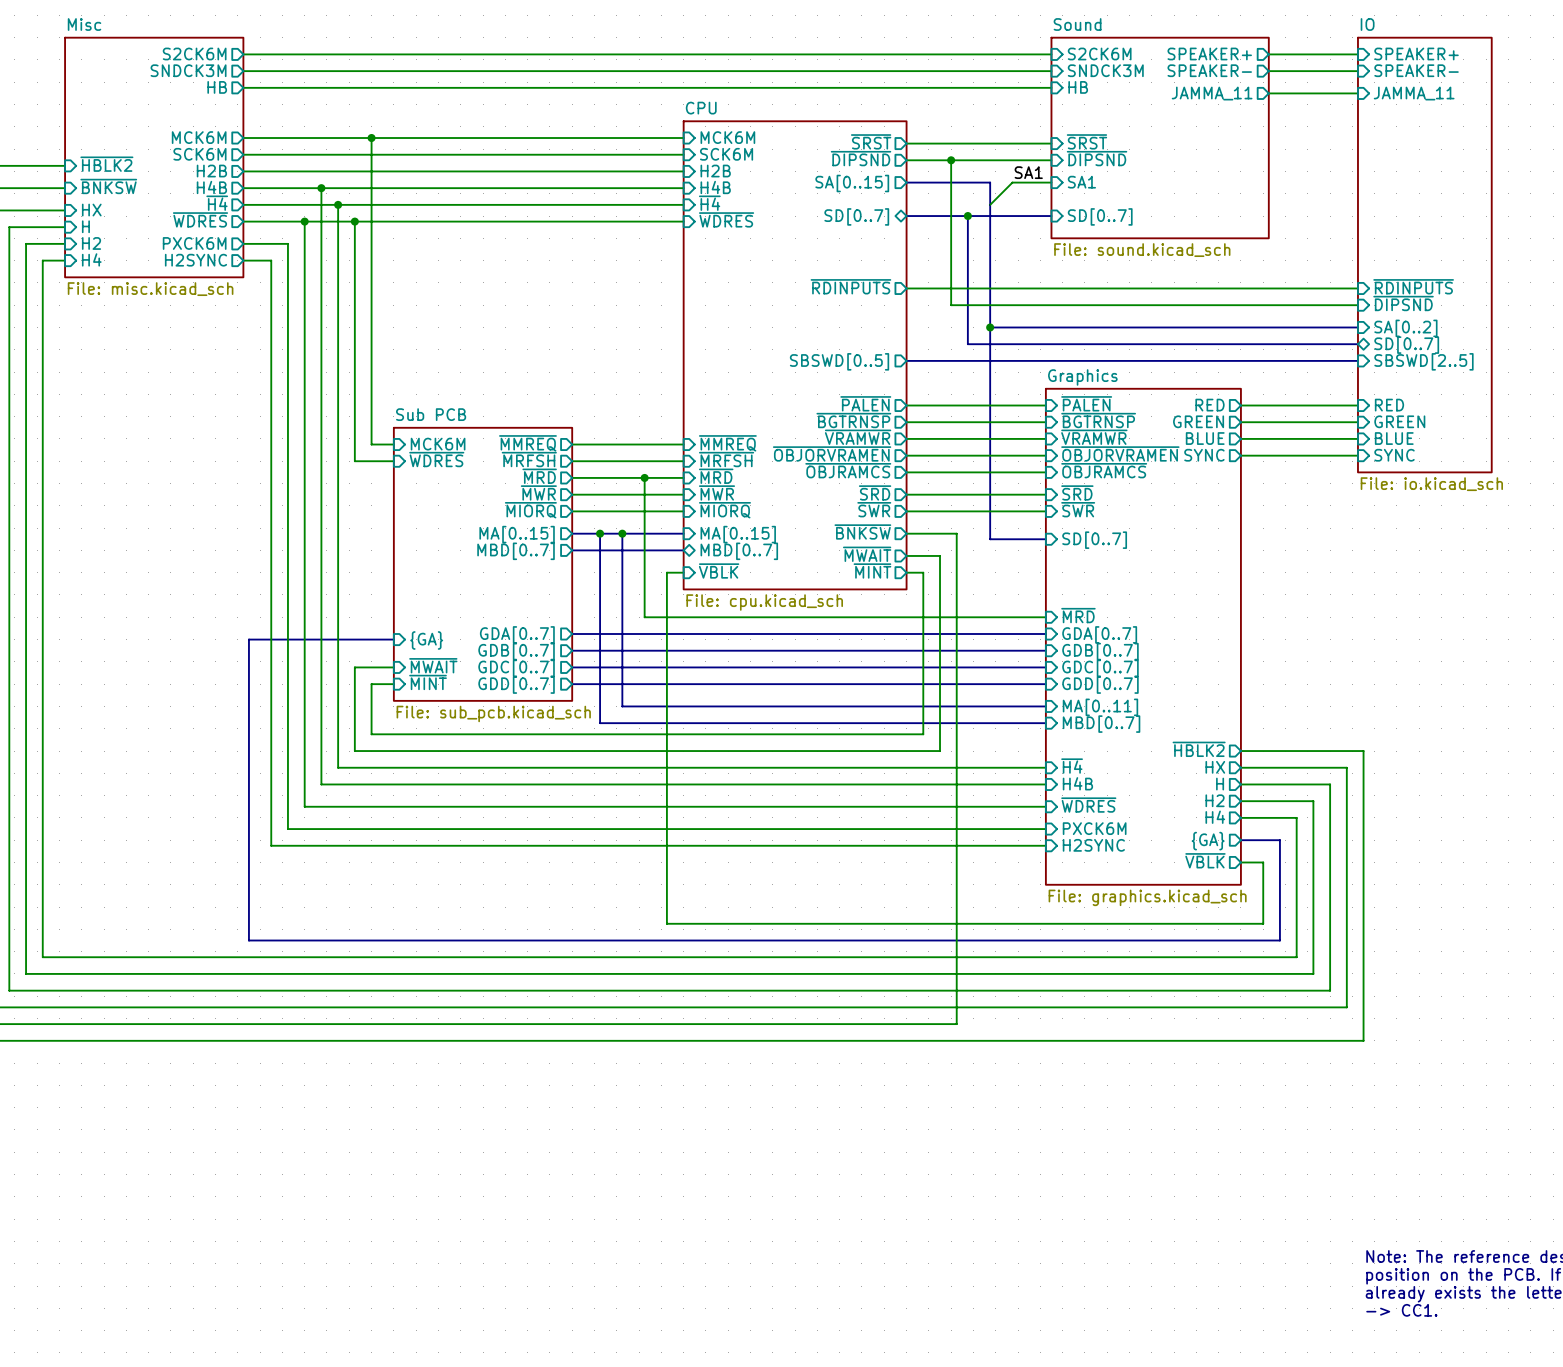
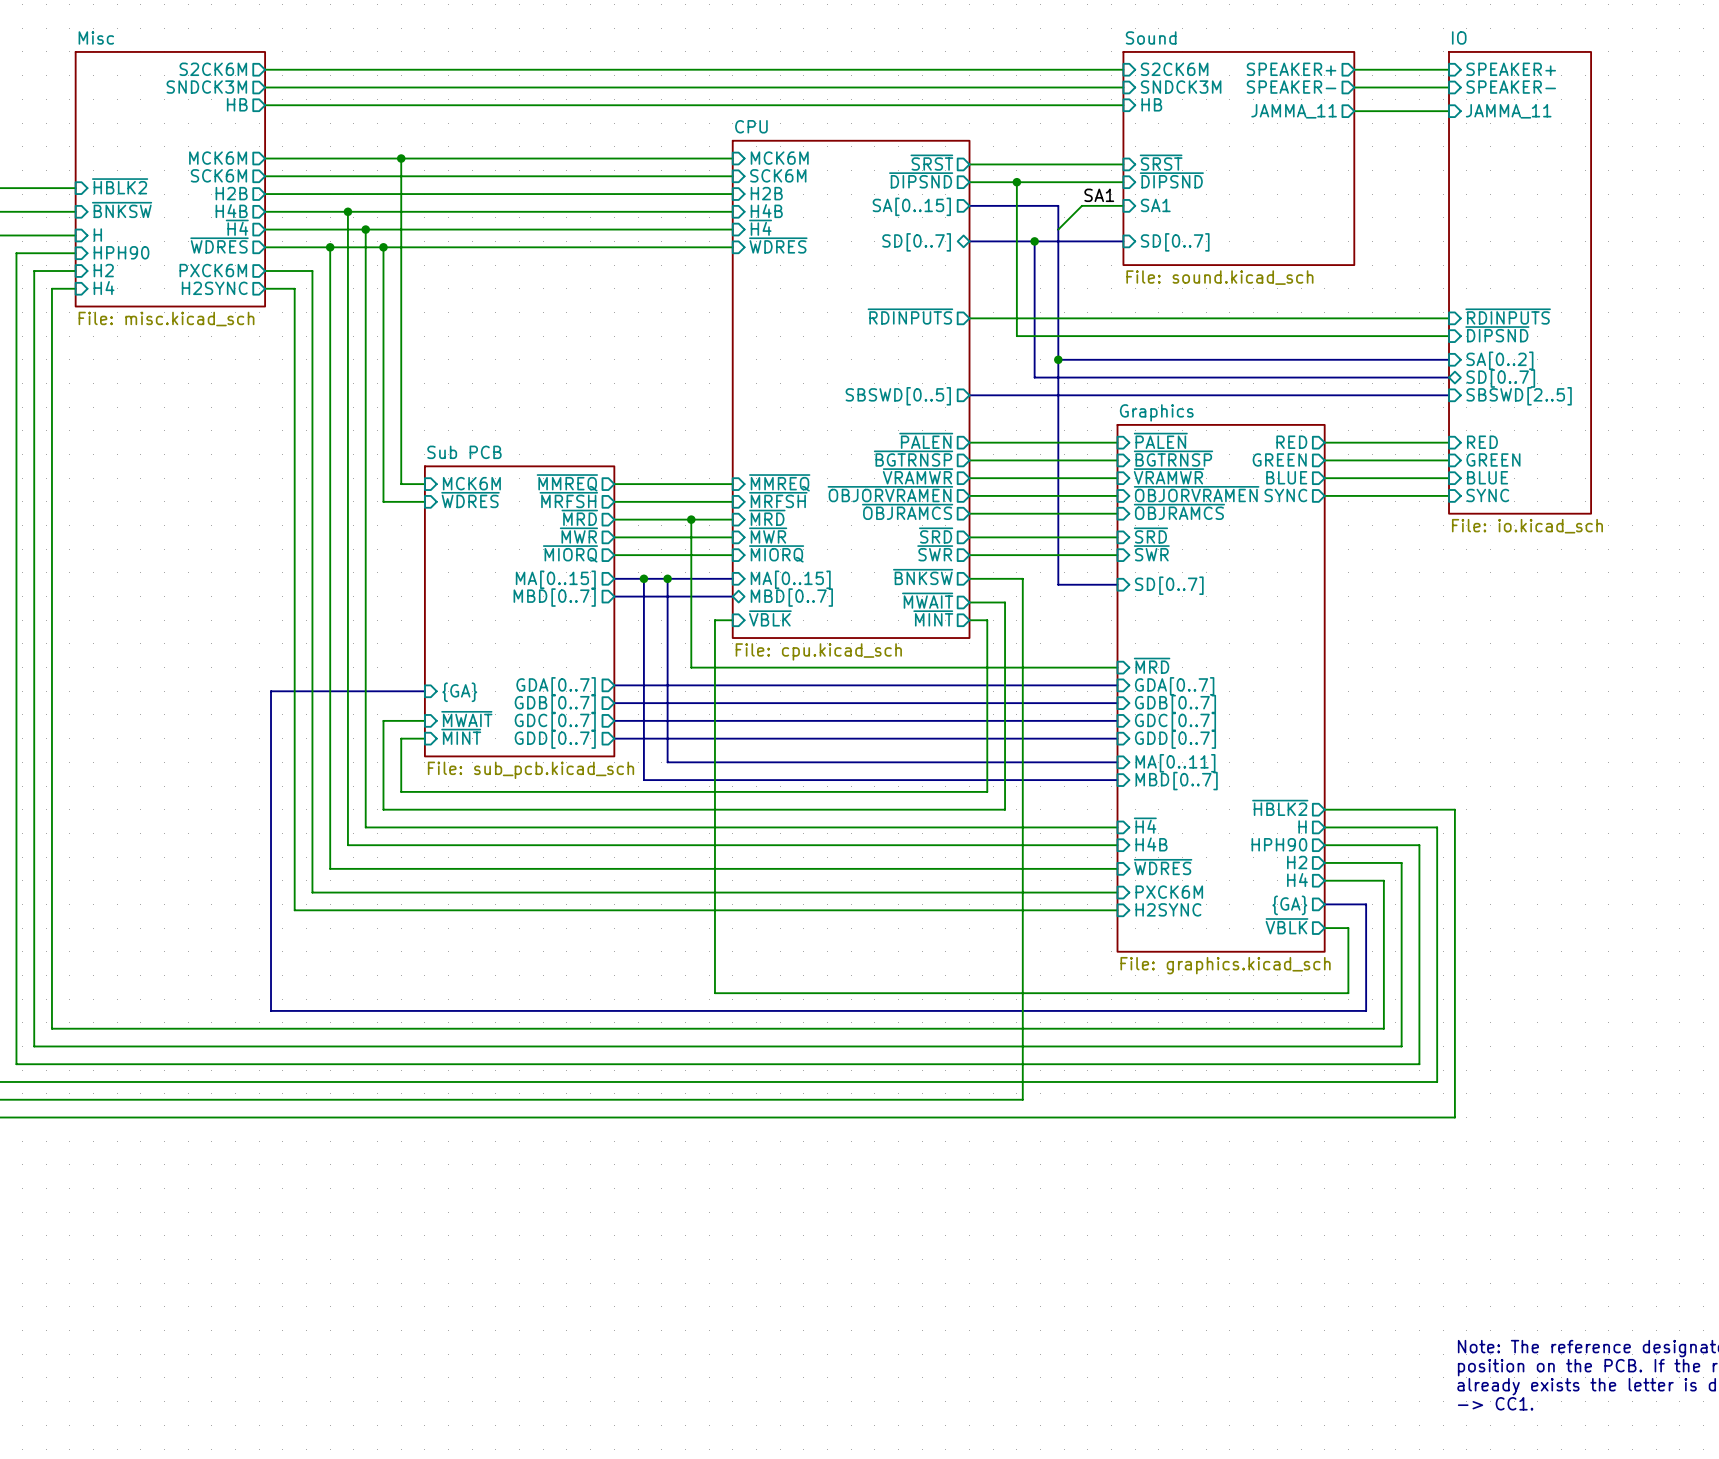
sheet pin: HX (91, 210) -> H (97, 235)
sheet pin: H (85, 226) -> HPH90 (121, 252)
sheet pin: HX (1215, 767) -> H (1302, 827)
sheet pin: H (1220, 784) -> HPH90 (1279, 844)

